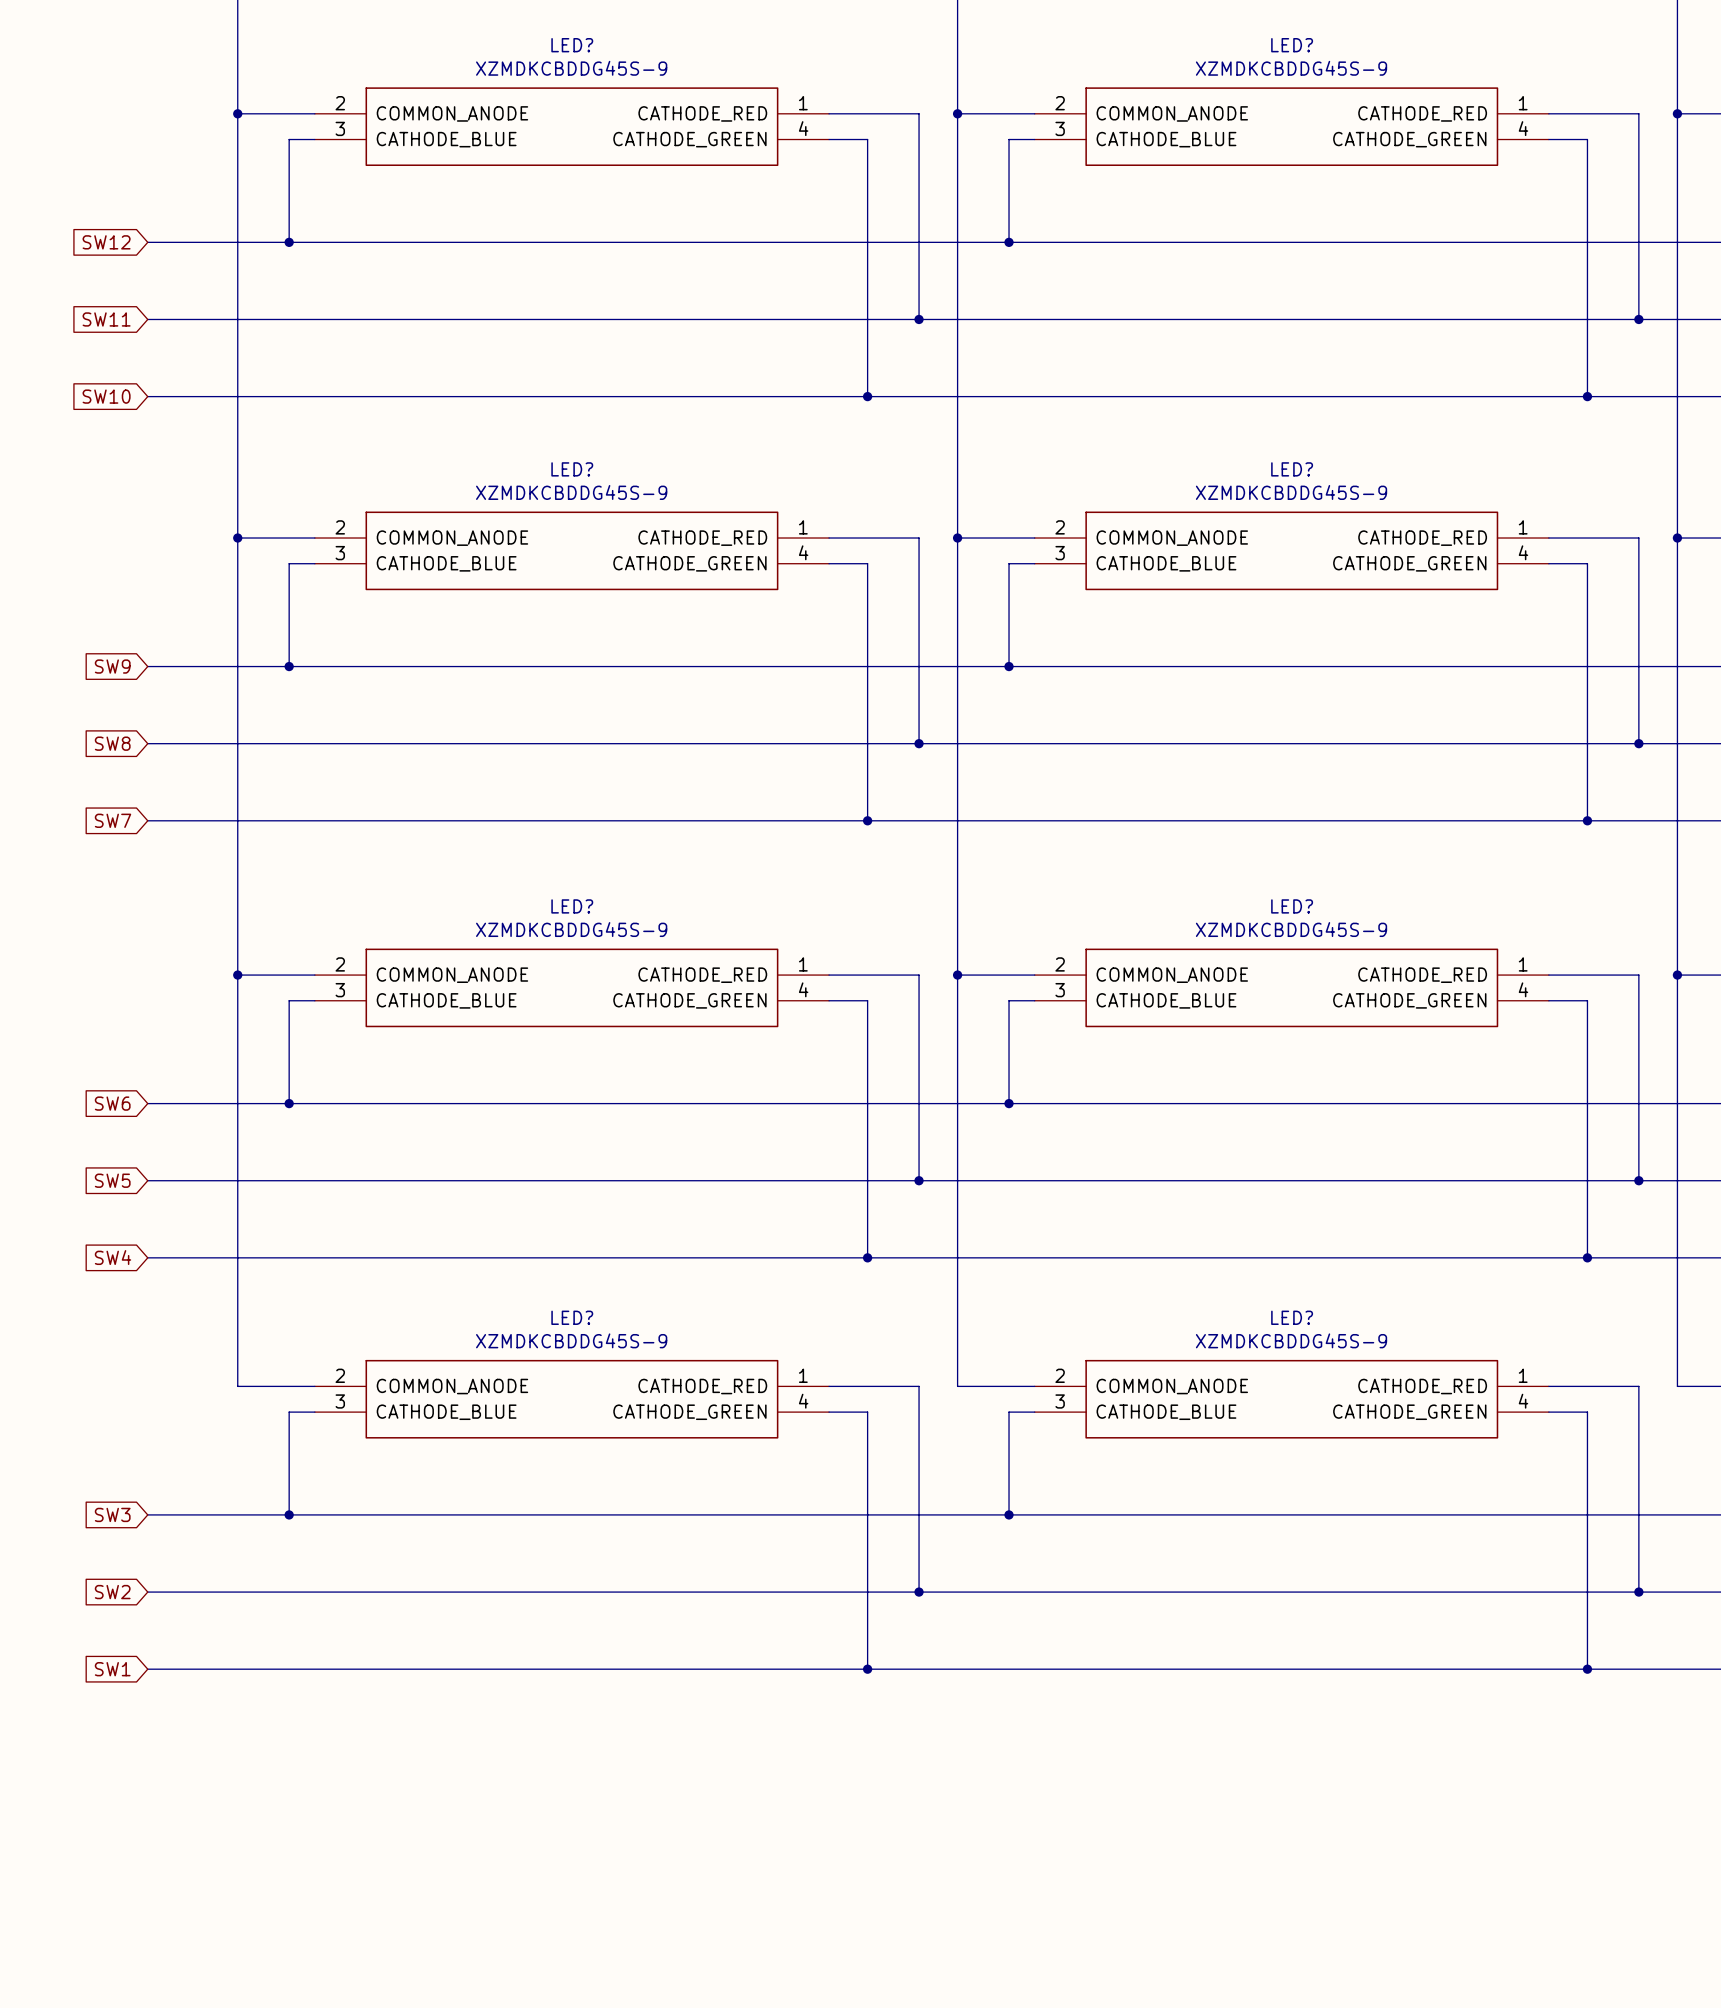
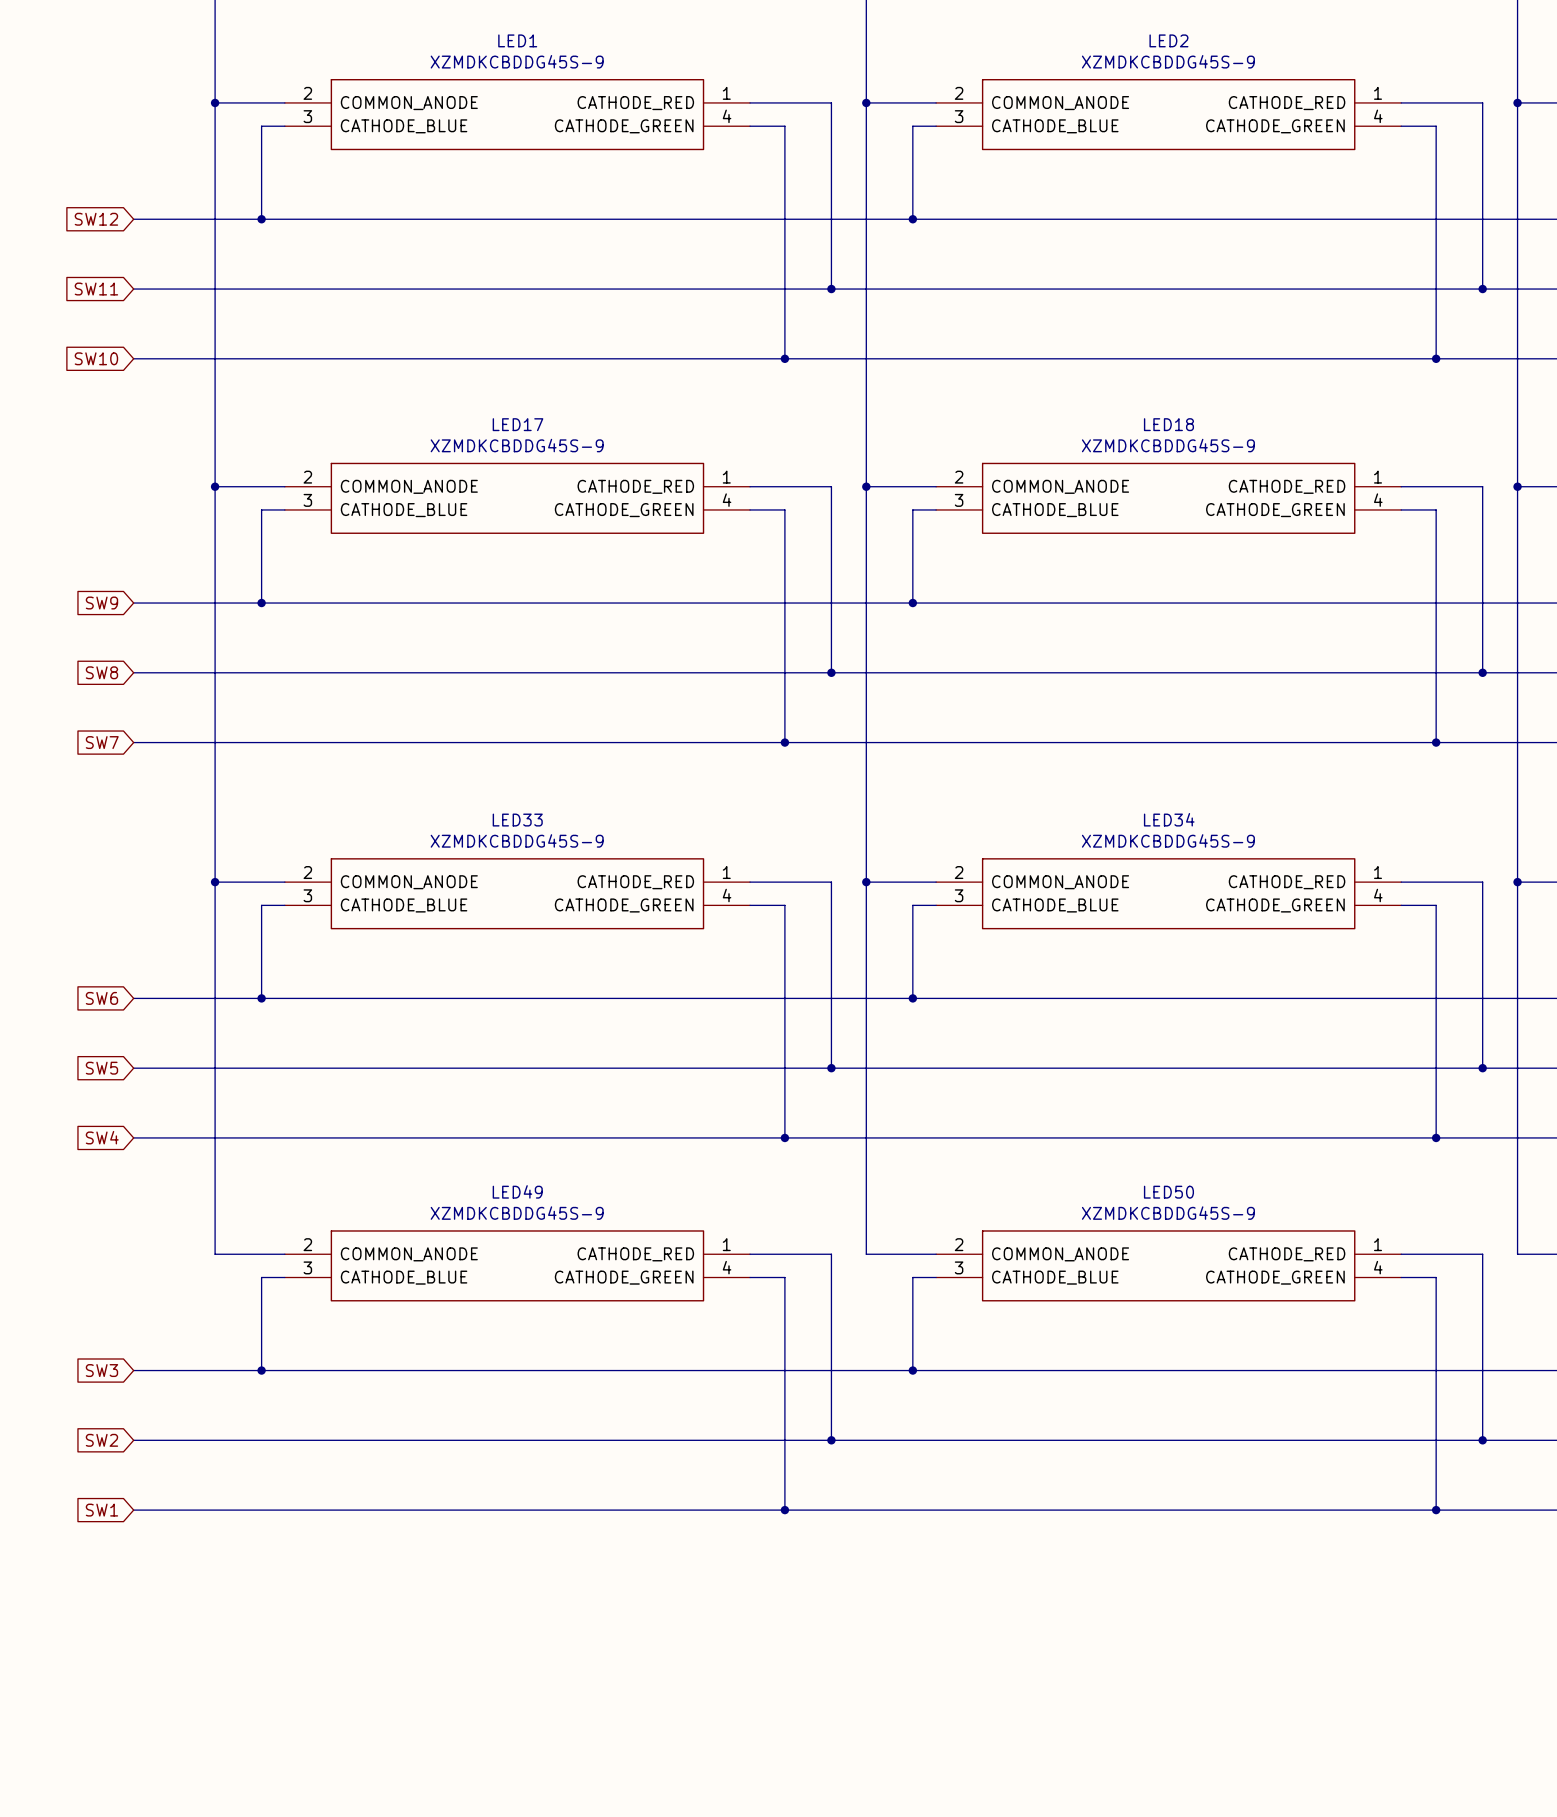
LED? name: LED? (572, 45) -> LED1 (517, 40)
LED? name: LED? (1292, 45) -> LED2 (1168, 40)
LED? name: LED? (572, 469) -> LED17 (518, 424)
LED? name: LED? (1292, 469) -> LED18 (1168, 424)
LED? name: LED? (572, 906) -> LED33 (517, 820)
LED? name: LED? (1292, 906) -> LED34 (1169, 819)
LED? name: LED? (572, 1317) -> LED49 (517, 1191)
LED? name: LED? (1292, 1317) -> LED50 (1168, 1192)

